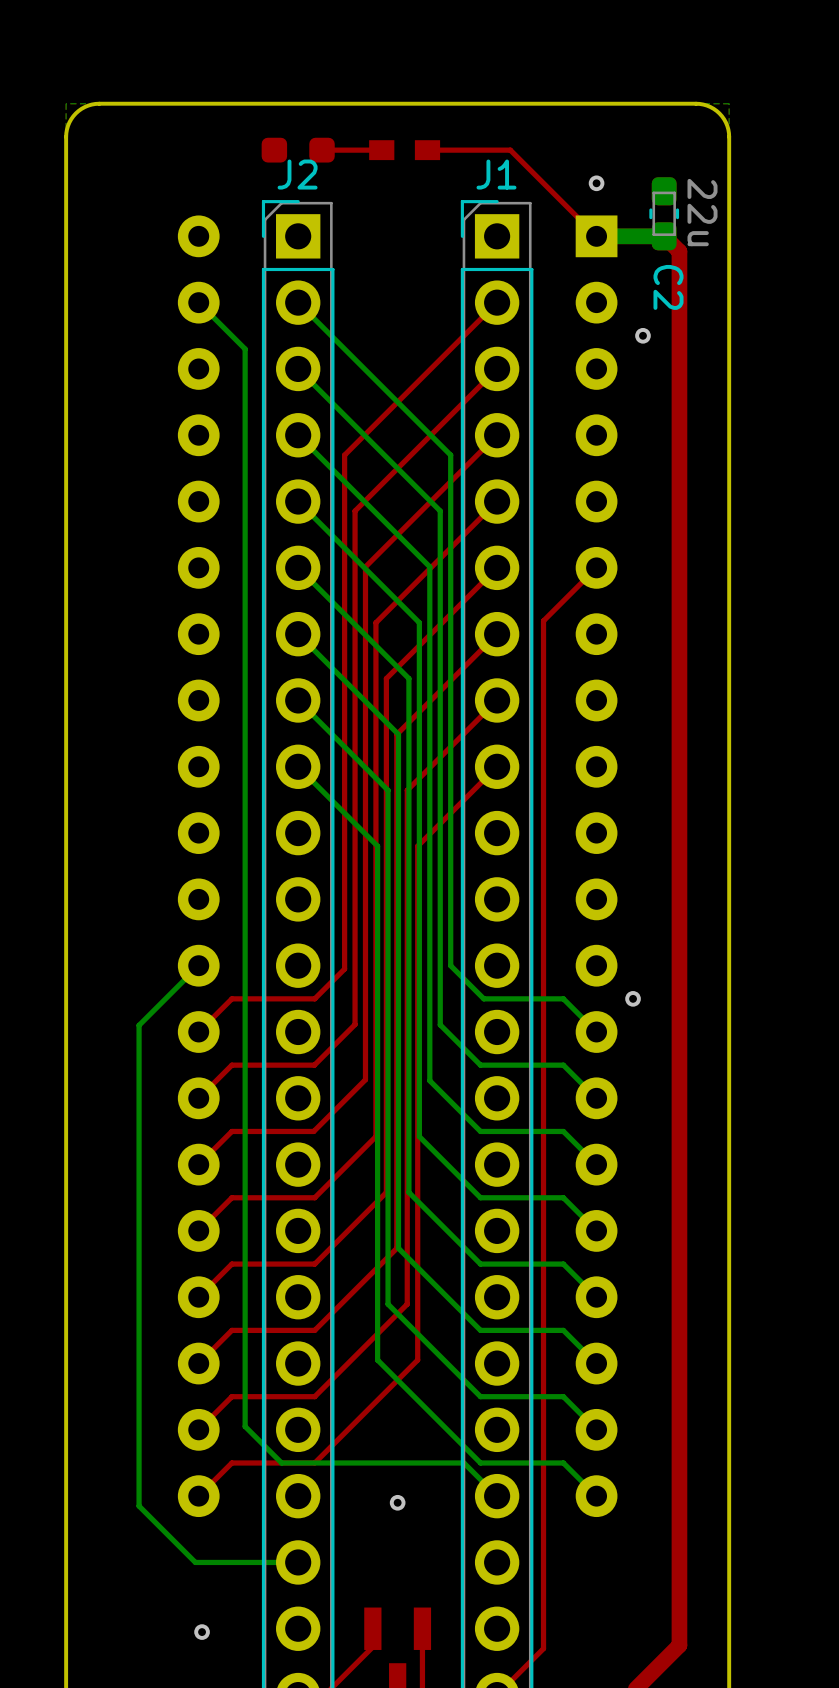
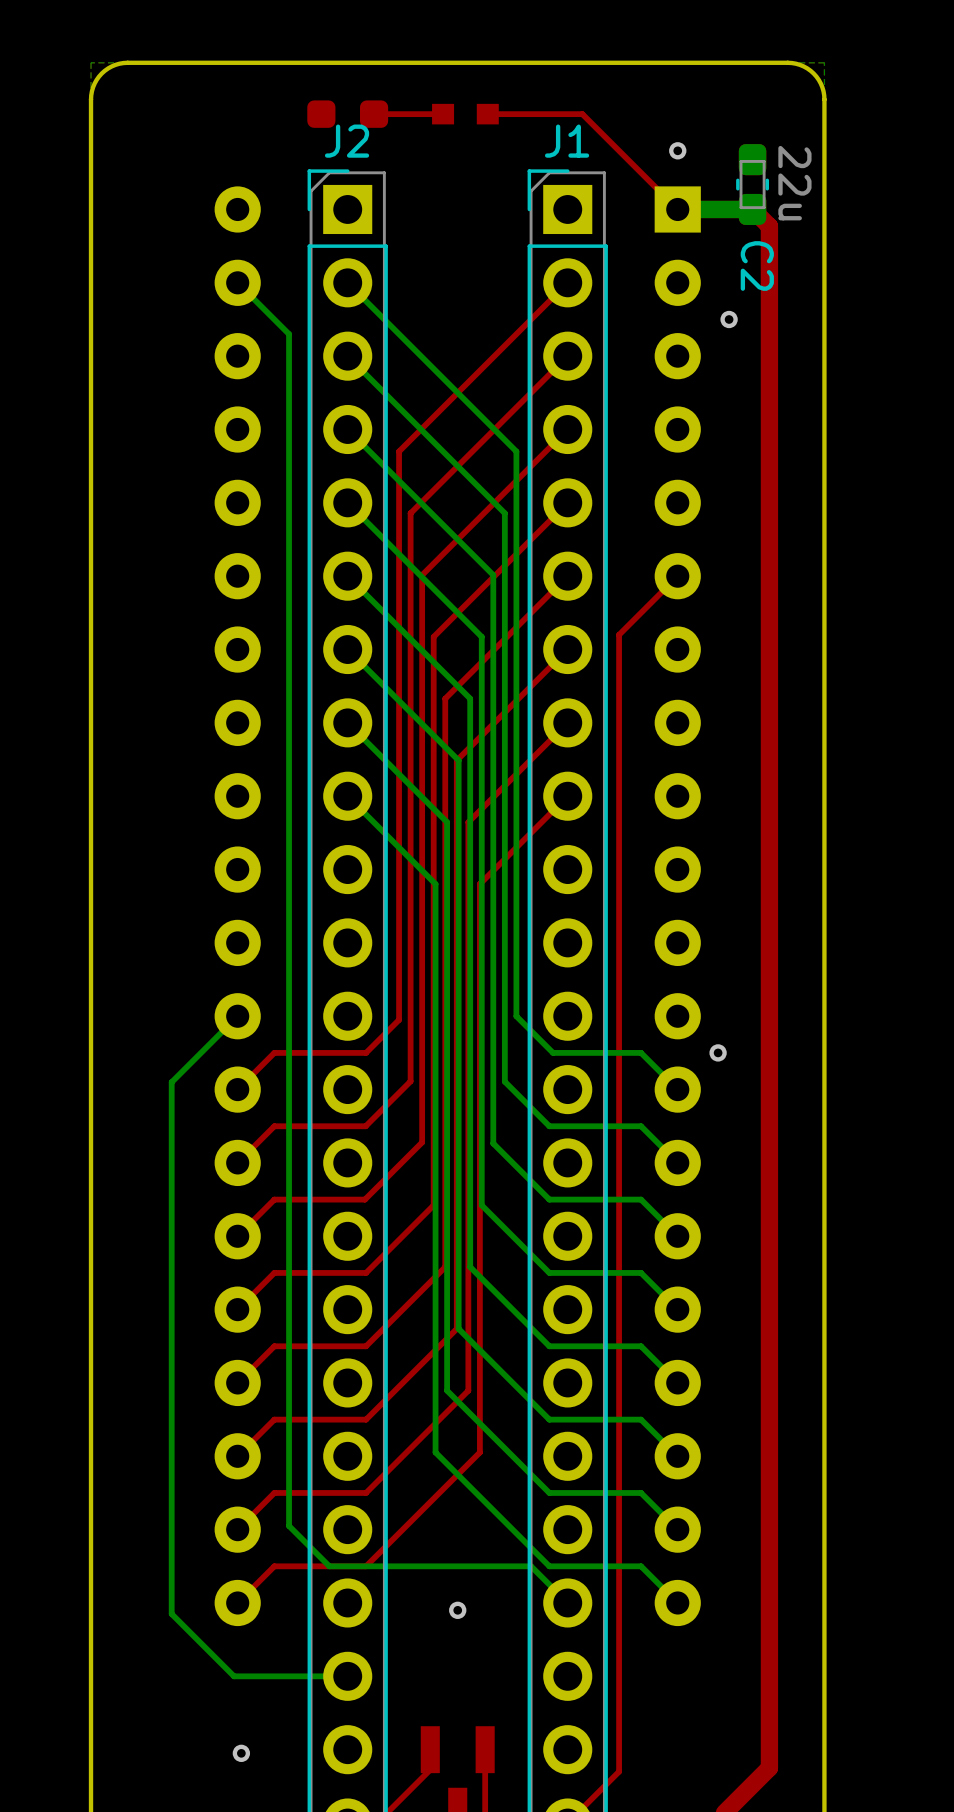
part footprint: [369, 140, 441, 161] -> [432, 103, 499, 125]

